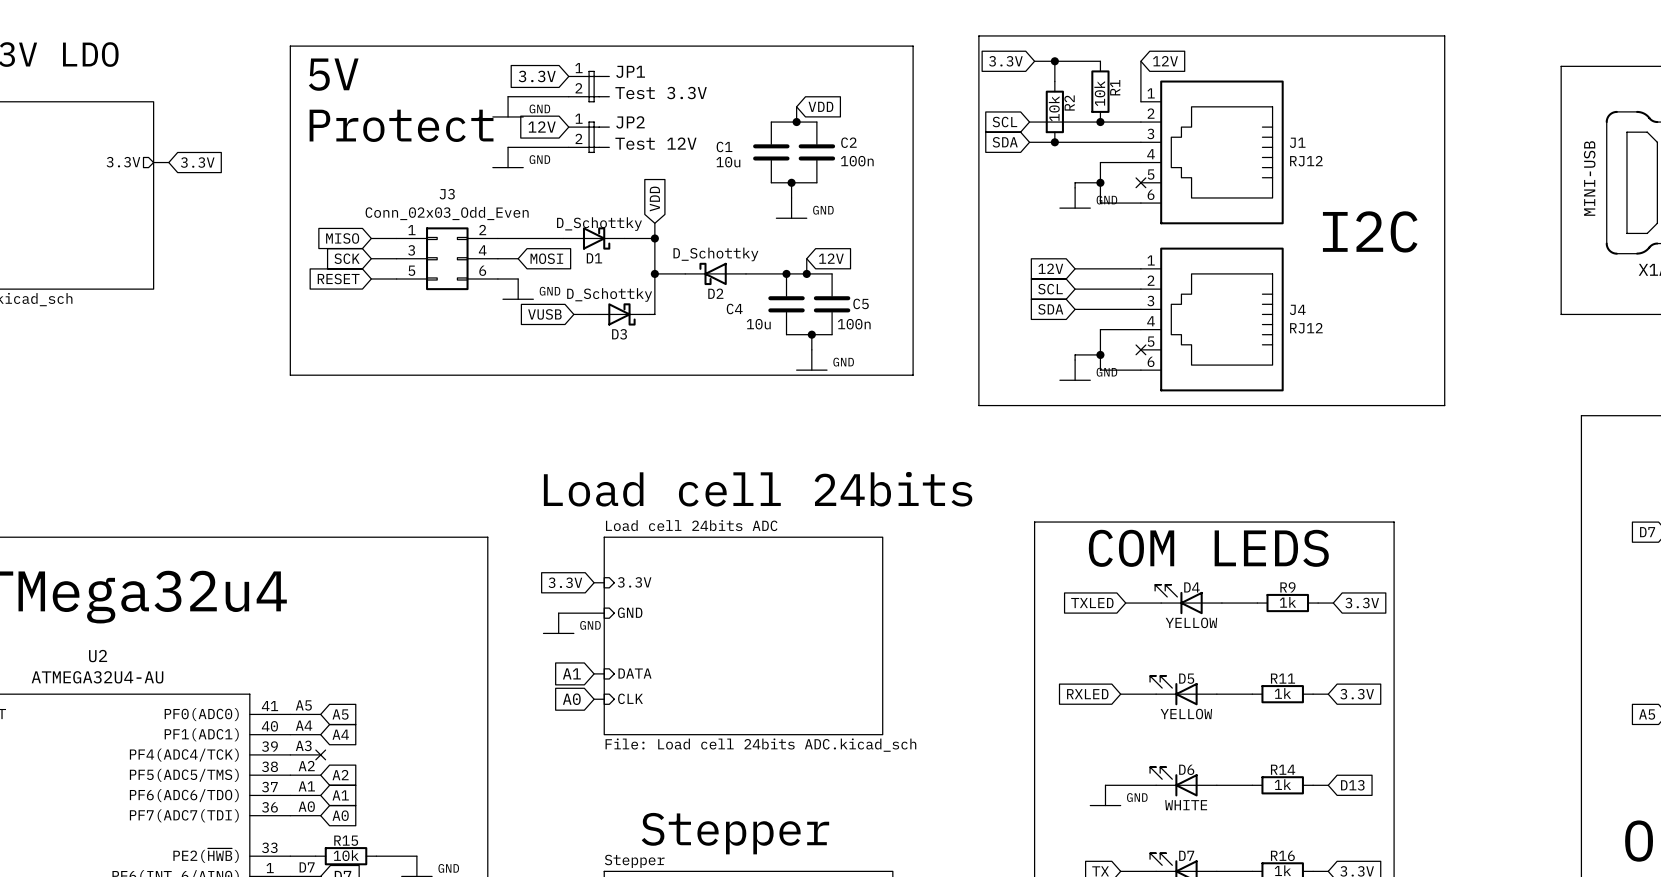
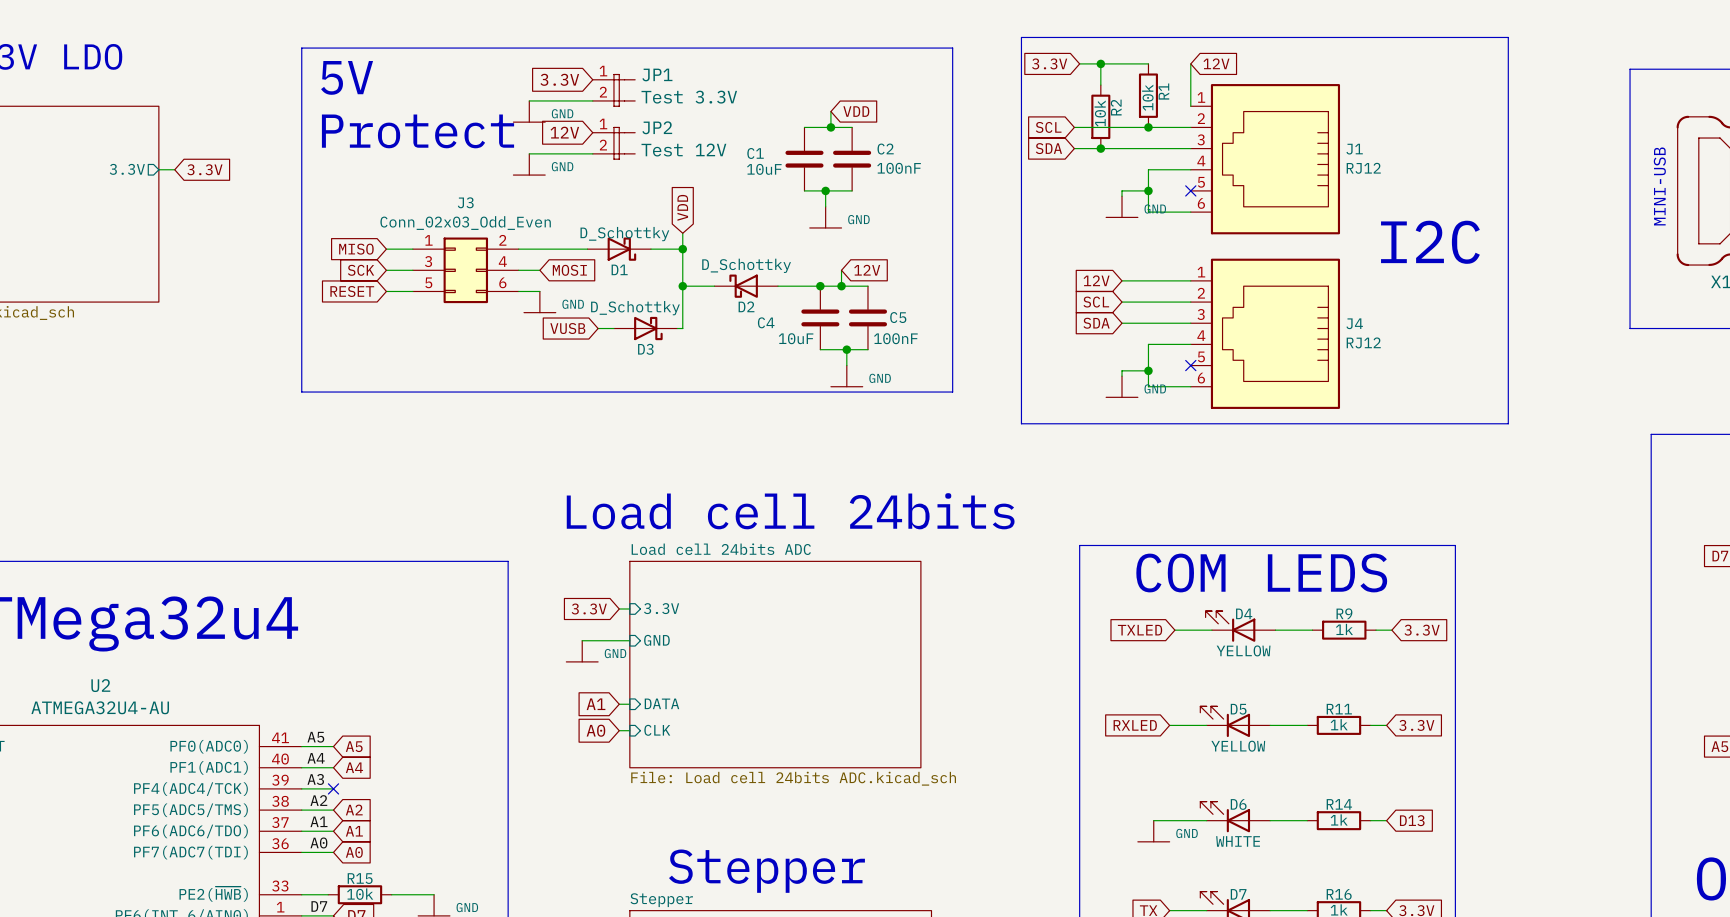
C2 value: 100n (857, 161) -> 100nF (899, 168)
C1 value: 10u (728, 162) -> 10uF (764, 169)
C4 value: 10u (758, 324) -> 10uF (796, 338)
C5 value: 100n (854, 324) -> 100nF (895, 338)

